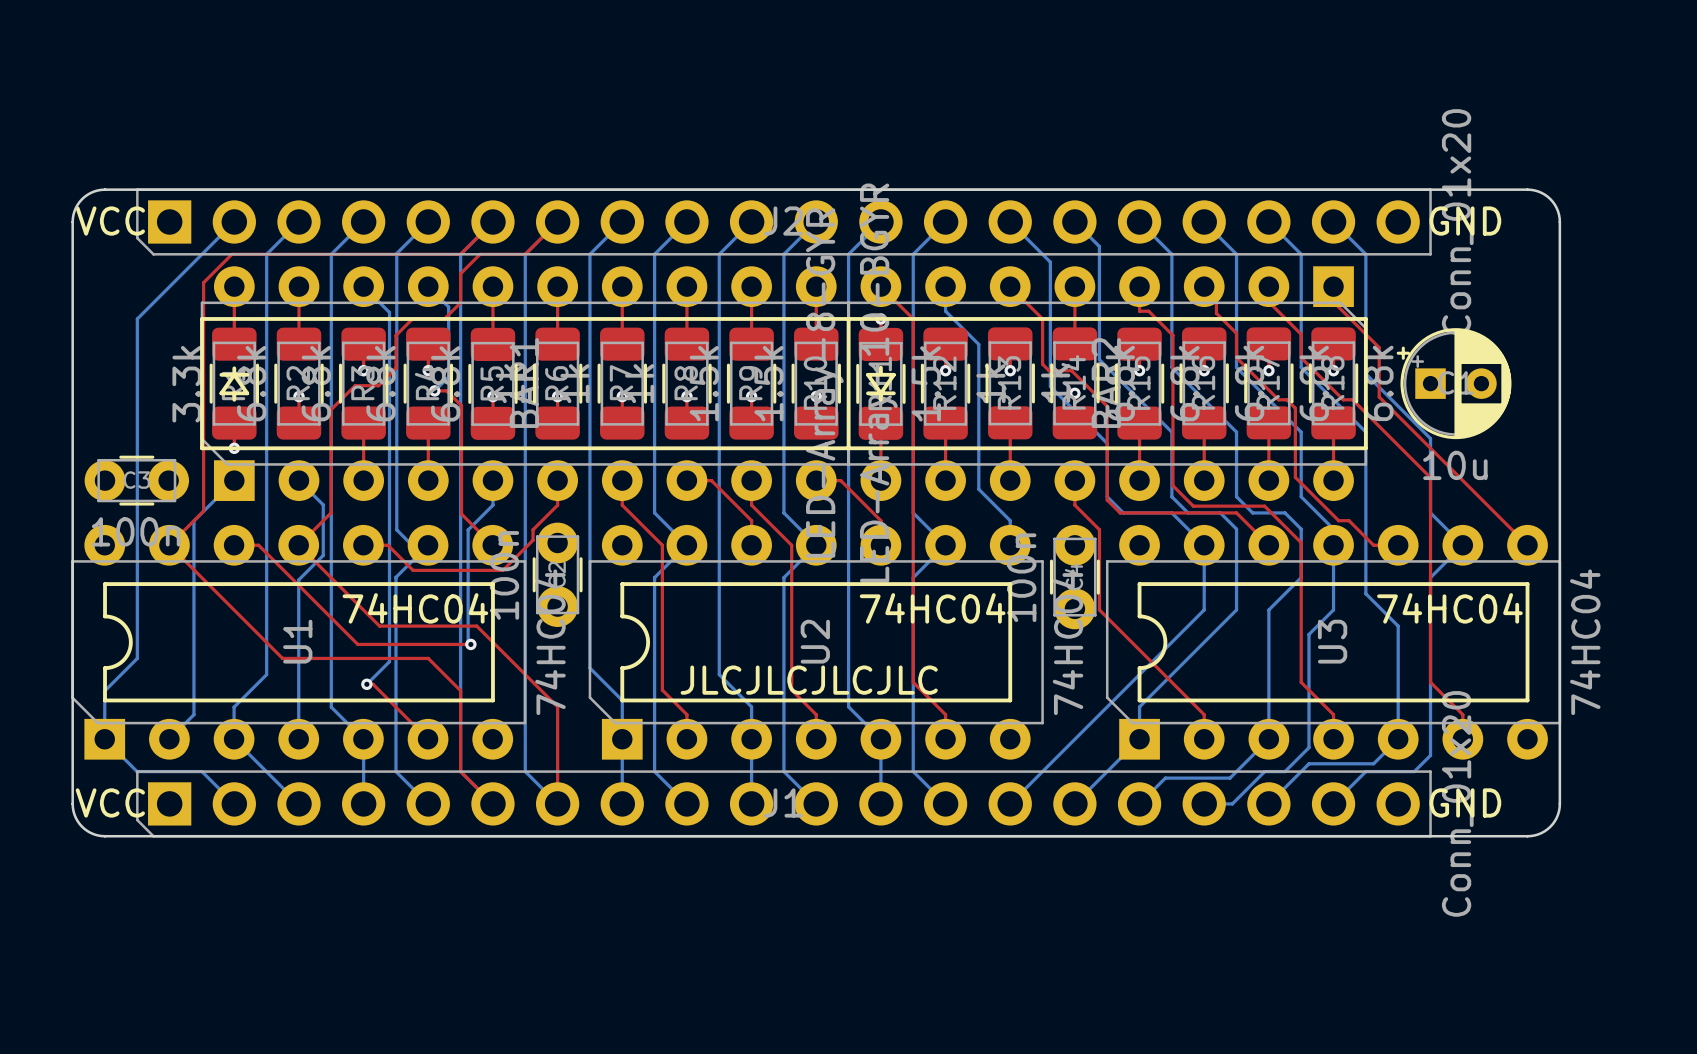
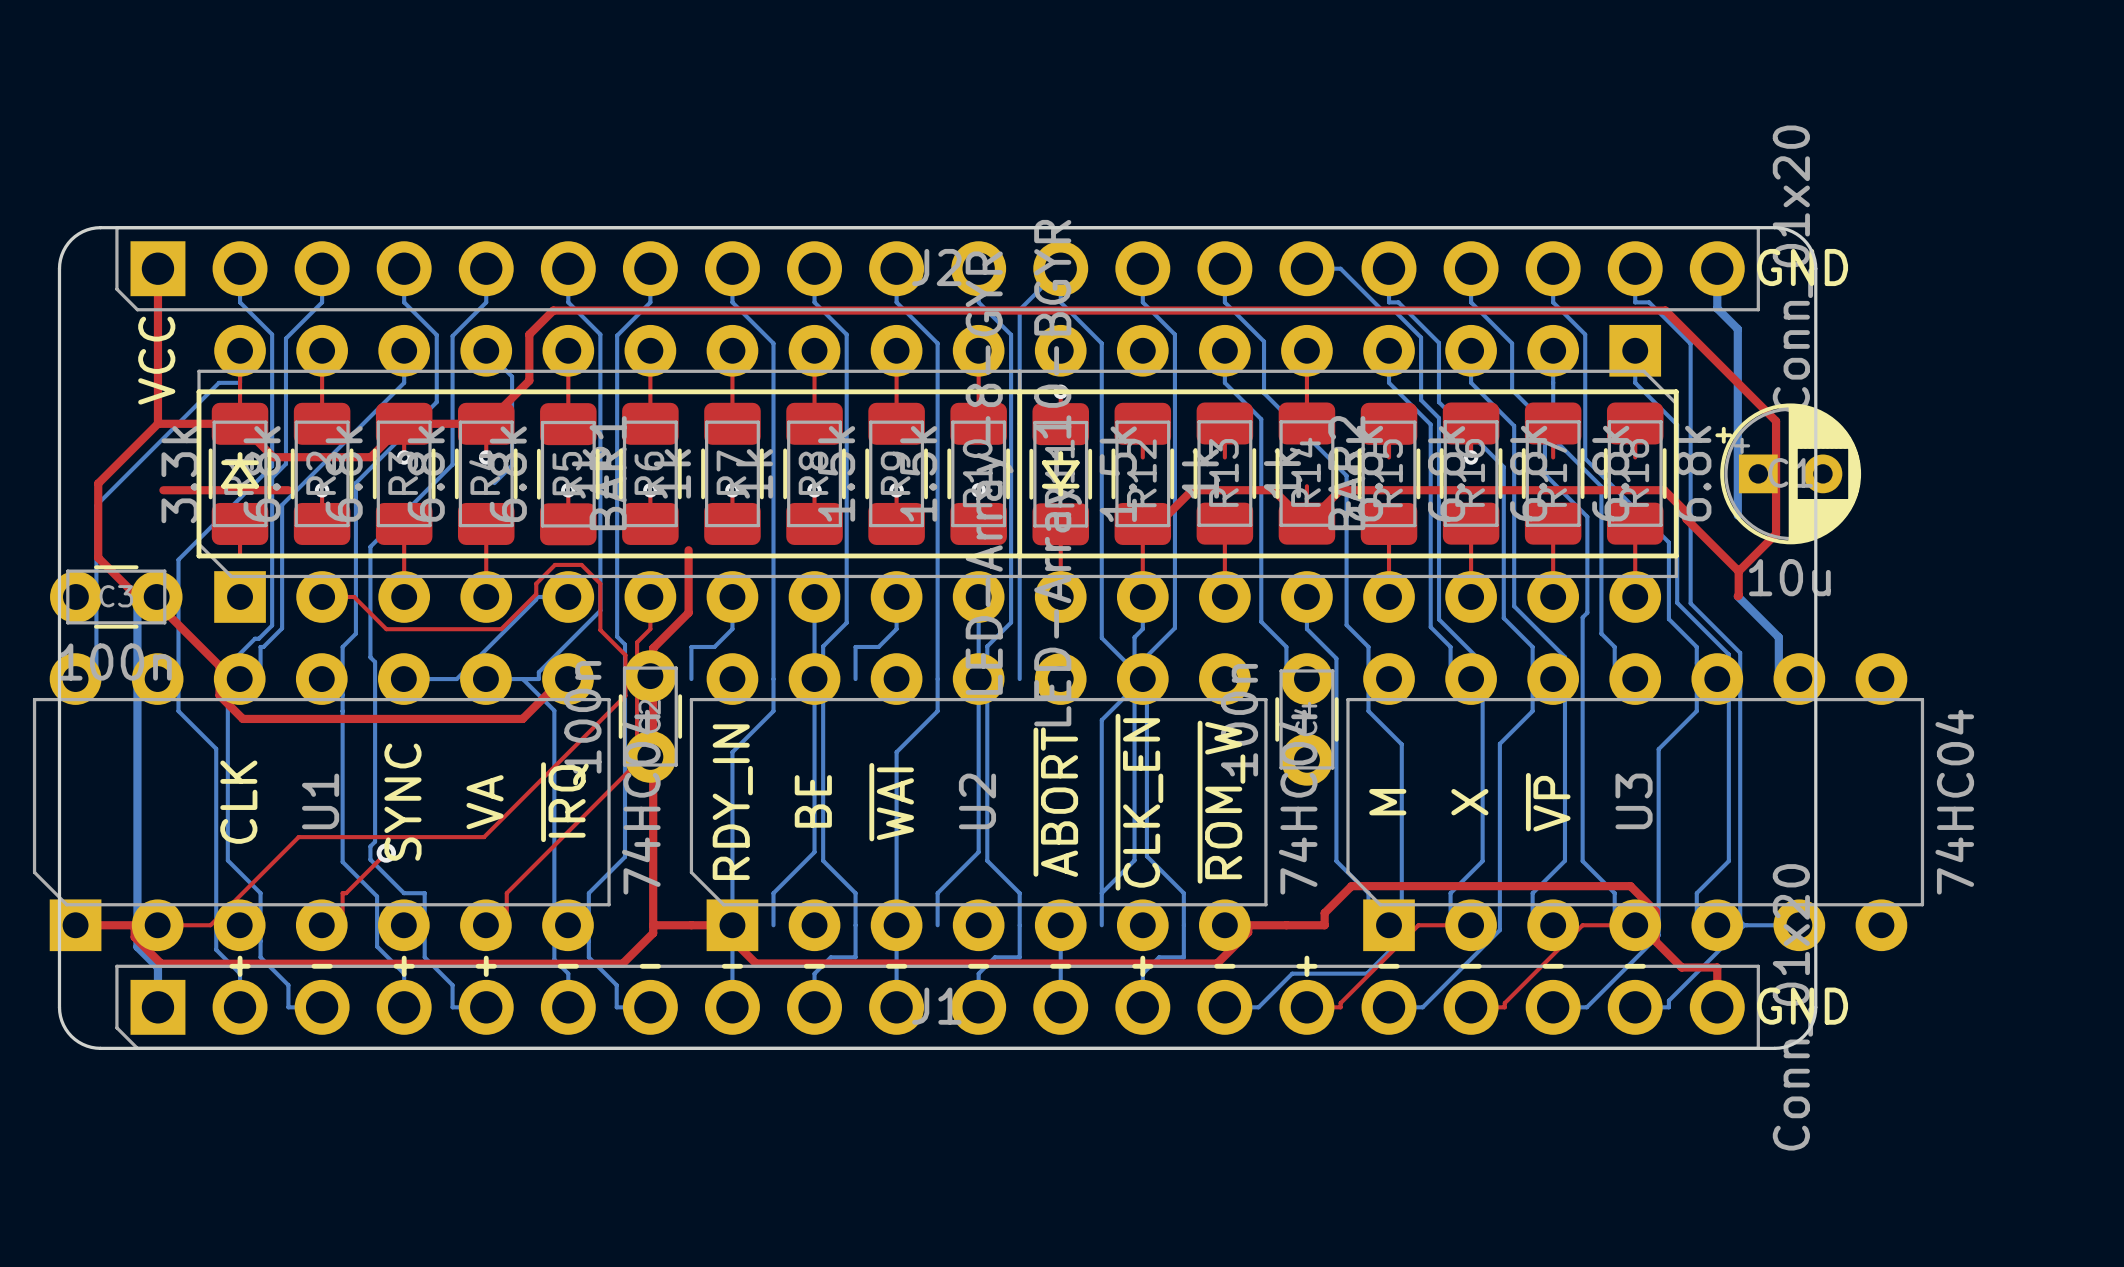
board edge: (124, 189) (101, 189) (87, 194) (75, 207) (72, 221) (72, 807) (77, 821) (87, 831) (101, 836) (124, 836) -> (100, 227) (86, 229) (71, 239) (61, 255) (59, 268) (59, 1007) (61, 1020) (71, 1036) (86, 1046) (100, 1048)
board edge: (1443, 189) (1534, 190) (1544, 194) (1552, 201) (1558, 211) (1559, 221) (1559, 811) (1550, 826) (1534, 835) (1443, 836) -> (1774, 227) (1788, 229) (1803, 239) (1813, 255) (1815, 268) (1815, 1007) (1813, 1020) (1803, 1036) (1788, 1046) (1774, 1048)
text rotation: 0° (110, 221) -> 90° counterclockwise (156, 360)
text position: VCC (110, 221) -> VCC (156, 360)
top track: none -> (157, 268) (157, 423)
bottom track: (234, 221) (137, 318) (137, 658) (104, 691) (104, 739) (137, 771) (202, 771) (234, 803) -> (240, 268) (240, 302) (272, 334) (272, 466) (178, 559) (178, 711) (216, 748) (216, 949) (240, 973) (240, 1007)
bottom track: (298, 221) (266, 254) (266, 674) (234, 707) (234, 739) (298, 803) -> (322, 268) (322, 302) (285, 338) (285, 463) (272, 477) (272, 625) (258, 638) (255, 638) (227, 665) (227, 860) (260, 893) (260, 957) (288, 985) (288, 1007) (321, 1007)
bottom track: (363, 221) (331, 254) (331, 707) (363, 739) (363, 777) -> (404, 268) (404, 302) (436, 334) (436, 402) (355, 482) (355, 633) (342, 646) (342, 711)
bottom track: (428, 221) (396, 253) (396, 529) (412, 545) (428, 545) (395, 577) (395, 771) (428, 803) -> (486, 268) (486, 302) (452, 336) (452, 464) (370, 546) (370, 657) (375, 662) (375, 841) (370, 846) (370, 859) (404, 893) (424, 893) (424, 957) (452, 985) (452, 1007) (486, 1007)
top track: (492, 221) (460, 254) (231, 254) (203, 282) (203, 511) (169, 545) (282, 658) (428, 658) (460, 690) (460, 771) (492, 803) -> none
bottom track: (492, 221) (460, 254) (460, 771) (492, 803) -> (568, 268) (568, 302) (600, 334) (600, 610) (538, 672) (538, 679) (506, 679)
top track: (557, 221) (525, 254) (480, 254) (460, 273) (460, 302) (444, 318) (412, 318) (395, 335) (395, 368) (378, 385) (355, 385) (331, 409) (331, 512) (298, 545) (379, 626) (476, 626) (557, 706) (557, 803) -> none
bottom track: (557, 221) (525, 254) (525, 771) (557, 803) -> (650, 268) (650, 302) (617, 335) (617, 636) (625, 644) (625, 857) (588, 893) (588, 957) (616, 985) (616, 1007) (650, 1007)
bottom track: (622, 221) (589, 254) (589, 520) -> (732, 596) (732, 629) (714, 646) (691, 646)
bottom track: (686, 221) (654, 254) (654, 280) -> (732, 268) (732, 302) (773, 343)
bottom track: (751, 221) (719, 254) (719, 520) -> (896, 596) (896, 629) (878, 646) (855, 646)
bottom track: (816, 221) (783, 254) (783, 280) -> (896, 268) (896, 302) (937, 343)
bottom track: (945, 221) (913, 254) (913, 280) -> (1060, 268) (1060, 302) (1101, 343)
bottom track: (1010, 221) (1050, 262) (1050, 386) (1107, 443) (1107, 496) (1123, 512) (1171, 512) (1204, 545) (1204, 609) (1010, 803) -> (1224, 268) (1224, 302) (1264, 341) (1264, 393) (1346, 475) (1346, 625) (1368, 646) (1368, 711) (1401, 744) (1401, 938) (1366, 973) (1292, 973) (1258, 1007) (1224, 1007)
bottom track: (1074, 221) (1099, 246) (1099, 359) (1171, 432) (1171, 496) (1188, 512) (1220, 512) (1236, 529) (1236, 609) (1139, 706) (1139, 739) (1074, 803) -> (1306, 268) (1340, 268) (1382, 310) (1394, 310) (1421, 337) (1421, 400) (1439, 418) (1439, 619) (1482, 663) (1482, 861) (1450, 893) (1450, 925)
bottom track: (1139, 221) (1171, 254) (1171, 367) (1236, 432) (1236, 496) (1252, 512) (1285, 512) (1301, 529) (1301, 577) (1268, 609) (1268, 739) (1230, 778) (1165, 778) (1139, 803) -> (1389, 268) (1389, 302) (1398, 302) (1438, 342) (1438, 402) (1503, 467) (1503, 618) (1532, 646) (1532, 711) (1499, 743) (1499, 930) (1422, 1007) (1389, 1007)
bottom track: (1204, 221) (1236, 254) (1236, 280) -> (1471, 268) (1471, 302) (1512, 343)
bottom track: (1268, 221) (1301, 254) (1301, 367) (1365, 432) (1365, 593) (1398, 626) (1398, 739) (1373, 763) (1309, 763) (1268, 803) -> (1553, 268) (1553, 302) (1585, 334) (1585, 458) (1668, 542) (1668, 619) (1696, 646) (1696, 711) (1658, 749) (1658, 935) (1586, 1007) (1553, 1007)
bottom track: (1333, 221) (1365, 254) (1365, 373) (1430, 438) (1430, 512) (1462, 545) (1430, 577) (1430, 755) (1414, 771) (1365, 771) (1333, 803) -> (1635, 268) (1635, 302) (1649, 302) (1690, 343) (1690, 603) (1740, 652) (1740, 921) (1744, 925)
bottom track: none -> (1717, 268) (1717, 308) (1737, 329) (1737, 515)
bottom track: none -> (240, 350) (240, 382) (218, 382) (96, 505) (96, 679)
bottom track: (363, 286) (389, 312) (389, 661) (366, 684) -> (404, 350) (404, 382) (282, 504) (282, 628) (263, 646) (260, 646) (260, 679)
top track: (880, 286) (913, 318) (913, 682) (945, 714) (945, 739) -> none
bottom track: (945, 286) (945, 311) (978, 344) (978, 489) (1010, 520) (1010, 545) -> none
top track: (1010, 286) (1042, 318) (1042, 364) (1049, 370) (1071, 370) (1107, 406) (1107, 500) (1120, 512) (1236, 512) (1268, 545) -> none
bottom track: none -> (1224, 350) (1224, 382) (1261, 419) (1261, 621) (1286, 646) (1286, 679)
top track: (1139, 286) (1139, 311) (1148, 311) (1172, 335) (1172, 485) (1193, 506) (1264, 506) (1301, 542) (1301, 682) (1333, 714) (1333, 739) -> none
bottom track: none -> (1389, 350) (1389, 382) (1430, 424) (1430, 627) (1450, 646) (1450, 679)
top track: (1204, 286) (1216, 298) (1216, 313) (1236, 333) (1236, 357) (1278, 399) (1286, 399) (1295, 408) (1295, 477) (1338, 520) (1349, 520) (1373, 545) (1398, 545) -> none
bottom track: none -> (1471, 350) (1471, 382) (1514, 425) (1514, 606) (1564, 657) (1564, 860) (1532, 893) (1532, 925)
top track: (1268, 286) (1268, 302) (1301, 334) (1301, 357) (1343, 399) (1352, 399) (1430, 477) (1430, 682) (1462, 714) (1462, 739) -> none
bottom track: none -> (1553, 350) (1553, 438) (1601, 486) (1601, 633) (1614, 646) (1614, 679)
top track: (1333, 286) (1333, 301) (1379, 347) (1379, 396) (1527, 545) -> none
bottom track: none -> (1635, 350) (1635, 382) (1677, 424) (1677, 602) (1728, 654) (1728, 861) (1696, 893) (1696, 925)
bottom track: (1236, 317) (1236, 367) (1301, 432) (1301, 496) (1333, 529) (1333, 609) (1309, 634) (1309, 747) (1285, 771) (1264, 771) (1232, 803) (1204, 803) -> (1512, 390) (1544, 422) (1544, 474) (1587, 516) (1587, 612) (1582, 617) (1582, 861) (1614, 893) (1614, 925)
top track: none -> (157, 423) (240, 423) (273, 457) (370, 457) (404, 423) (486, 423) (529, 380) (529, 334) (553, 310) (1665, 310) (1776, 421) (1776, 533) (1738, 571)
top track: none -> (157, 423) (98, 483) (98, 557) (137, 596) (150, 596) (219, 665) (219, 695) (242, 718) (522, 718) (550, 691) (550, 679) (588, 679)
via: (945, 370) -> none
via: (1010, 370) -> none
via: (1139, 370) -> none
via: (1268, 370) -> none
via: (1333, 370) -> none
top track: (434, 390) (446, 390) (461, 405) (461, 514) (492, 545) -> none
via: (434, 390) -> none
via: (1074, 393) -> none
top track: none -> (163, 490) (288, 490)
top track: none -> (1150, 531) (1192, 490) (1273, 490) (1306, 523) (1340, 490) (1664, 490) (1686, 512) (1686, 519) (1738, 571)
top track: none -> (688, 550) (688, 612) (653, 648) (653, 933) (622, 963) (161, 963) (134, 937) (134, 925) (96, 925)
via: (234, 448) -> none
top track: none -> (1738, 571) (1737, 596)
bottom track: none -> (137, 596) (137, 946) (157, 967) (157, 1007)
bottom track: (234, 480) (193, 521) (193, 714) (169, 739) -> none
top track: none -> (322, 596) (354, 596) (386, 629) (501, 629) (536, 594) (536, 583) (555, 564) (581, 564) (600, 583) (600, 630) (625, 655) (625, 695) (484, 837) (298, 837) (210, 925) (178, 925)
bottom track: (298, 480) (323, 504) (323, 555) (298, 579) (298, 739) -> none
bottom track: (492, 480) (492, 505) (468, 530) (468, 641) (470, 644) -> (568, 596) (536, 596) (536, 599) (456, 679) (424, 679)
top track: (622, 480) (622, 505) (662, 545) (662, 690) (686, 714) (686, 739) -> none
top track: (686, 480) (711, 480) (751, 520) (751, 545) -> none
bottom track: none -> (814, 596) (814, 852) (773, 893)
top track: (751, 480) (751, 505) (791, 545) (791, 690) (816, 714) (816, 739) -> none
top track: (816, 480) (840, 480) (880, 520) (880, 545) -> none
bottom track: none -> (978, 596) (978, 852) (937, 893)
bottom track: none -> (1142, 596) (1142, 629) (1134, 637) (1134, 860) (1101, 893)
top track: (1074, 480) (1074, 505) (1099, 529) (1099, 609) (1204, 714) (1204, 739) -> none
bottom track: none -> (1306, 596) (1306, 629) (1336, 658) (1336, 861) (1368, 893) (1368, 925)
bottom track: none -> (1737, 596) (1778, 637) (1778, 679)
top track: (557, 505) (533, 529) (533, 540) (502, 570) (413, 570) (387, 545) (363, 545) -> (650, 628) (637, 642) (637, 762) (506, 893) (506, 925)
bottom track: (654, 512) (686, 545) (654, 577) (654, 713) -> (773, 638) (773, 711) (732, 752) (732, 876)
bottom track: (783, 512) (816, 545) (783, 577) (783, 713) -> (937, 638) (937, 711) (896, 752) (896, 884)
top track: (234, 545) (258, 545) (357, 644) (470, 644) -> none
bottom track: none -> (522, 679) (554, 710) (554, 959) (568, 973) (568, 1007)
bottom track: (589, 545) (589, 668) (622, 700) -> none
bottom track: (719, 545) (719, 674) (751, 706) -> none
bottom track: (848, 545) (848, 706) (880, 739) -> none
bottom track: none -> (342, 711) (342, 861) (377, 896) (377, 946) (404, 973)
line: (105, 584) (492, 584) (492, 700) (105, 700) (105, 668) (114, 666) (123, 660) (128, 652) (130, 642) (128, 632) (123, 623) (114, 618) (105, 616) (105, 584) -> none
line: (622, 584) (1010, 584) (1010, 700) (622, 700) (622, 668) (632, 666) (640, 660) (646, 652) (648, 642) (646, 632) (640, 623) (632, 618) (622, 616) (622, 584) -> none
line: (1139, 584) (1527, 584) (1527, 700) (1139, 700) (1139, 668) (1149, 666) (1157, 660) (1163, 652) (1165, 642) (1163, 632) (1157, 623) (1149, 618) (1139, 616) (1139, 584) -> none
text: 74HC04 (415, 608) -> none
text: 74HC04 (932, 608) -> none
text: 74HC04 (1449, 608) -> none
text: none -> BE (813, 801)
text: none -> CLK (238, 802)
text: none -> SYNC (402, 802)
text: none -> VA (485, 802)
text: none -> ~{IRQ} (564, 802)
text: none -> RDY_IN (732, 802)
text: none -> ~{WAI} (891, 802)
text: none -> ~{ABORT} (1055, 802)
text: none -> ~{CLK_EN} (1139, 802)
text: none -> ~{ROM_W} (1221, 802)
text: none -> M (1387, 802)
text: none -> X (1469, 802)
text: none -> ~{VP} (1548, 802)
via: (470, 644) -> none
text: JLCJLCJLCJLC (809, 680) -> none
top track: none -> (386, 853) (346, 893) (342, 893) (342, 925)
via: none -> (386, 853)
top track: (366, 684) (373, 684) (428, 739) -> none
via: (366, 684) -> none
top track: none -> (653, 925) (729, 925) (729, 937) (755, 963) (1217, 963) (1248, 932) (1248, 925) (1324, 925) (1324, 913) (1351, 886) (1630, 886) (1655, 911) (1655, 941) (1681, 967) (1717, 967) (1717, 1007)
bottom track: (654, 739) (654, 771) (686, 803) -> (814, 268) (814, 302) (846, 334) (846, 622) (823, 646) (823, 860) (855, 893) (855, 957) (830, 957) (814, 973) (814, 1007)
bottom track: (783, 739) (783, 771) (816, 803) -> (978, 268) (978, 302) (1011, 334) (1011, 622) (987, 646) (987, 860) (1019, 893) (1019, 957) (994, 957) (978, 973) (978, 1007)
bottom track: (913, 739) (913, 771) (945, 803) -> (1142, 268) (1142, 302) (1174, 334) (1174, 628) (1146, 656) (1146, 856) (1183, 893) (1183, 957) (1159, 957) (1142, 973) (1142, 1007)
top track: none -> (1450, 925) (1418, 925) (1340, 1003) (1340, 1007) (1306, 1007)
top track: none -> (1614, 925) (1582, 925) (1504, 1003) (1504, 1007) (1471, 1007)
bottom track: none -> (1744, 925) (1778, 925)
bottom track: none -> (1744, 925) (1668, 1000) (1668, 1007) (1635, 1007)
line: none -> (240, 958) (240, 974)
line: none -> (404, 958) (404, 974)
line: none -> (486, 958) (486, 974)
line: none -> (1142, 958) (1142, 974)
line: none -> (1306, 958) (1306, 974)
line: none -> (231, 966) (248, 966)
line: none -> (313, 966) (330, 966)
line: none -> (395, 966) (412, 966)
line: none -> (478, 966) (494, 966)
line: none -> (560, 966) (576, 966)
line: none -> (642, 966) (658, 966)
line: none -> (724, 966) (740, 966)
line: none -> (806, 966) (822, 966)
line: none -> (888, 966) (904, 966)
line: none -> (970, 966) (986, 966)
line: none -> (1052, 966) (1068, 966)
line: none -> (1134, 966) (1151, 966)
line: none -> (1216, 966) (1233, 966)
line: none -> (1298, 966) (1315, 966)
line: none -> (1380, 966) (1397, 966)
line: none -> (1462, 966) (1479, 966)
line: none -> (1544, 966) (1561, 966)
line: none -> (1627, 966) (1643, 966)
text: VCC (110, 802) -> none

